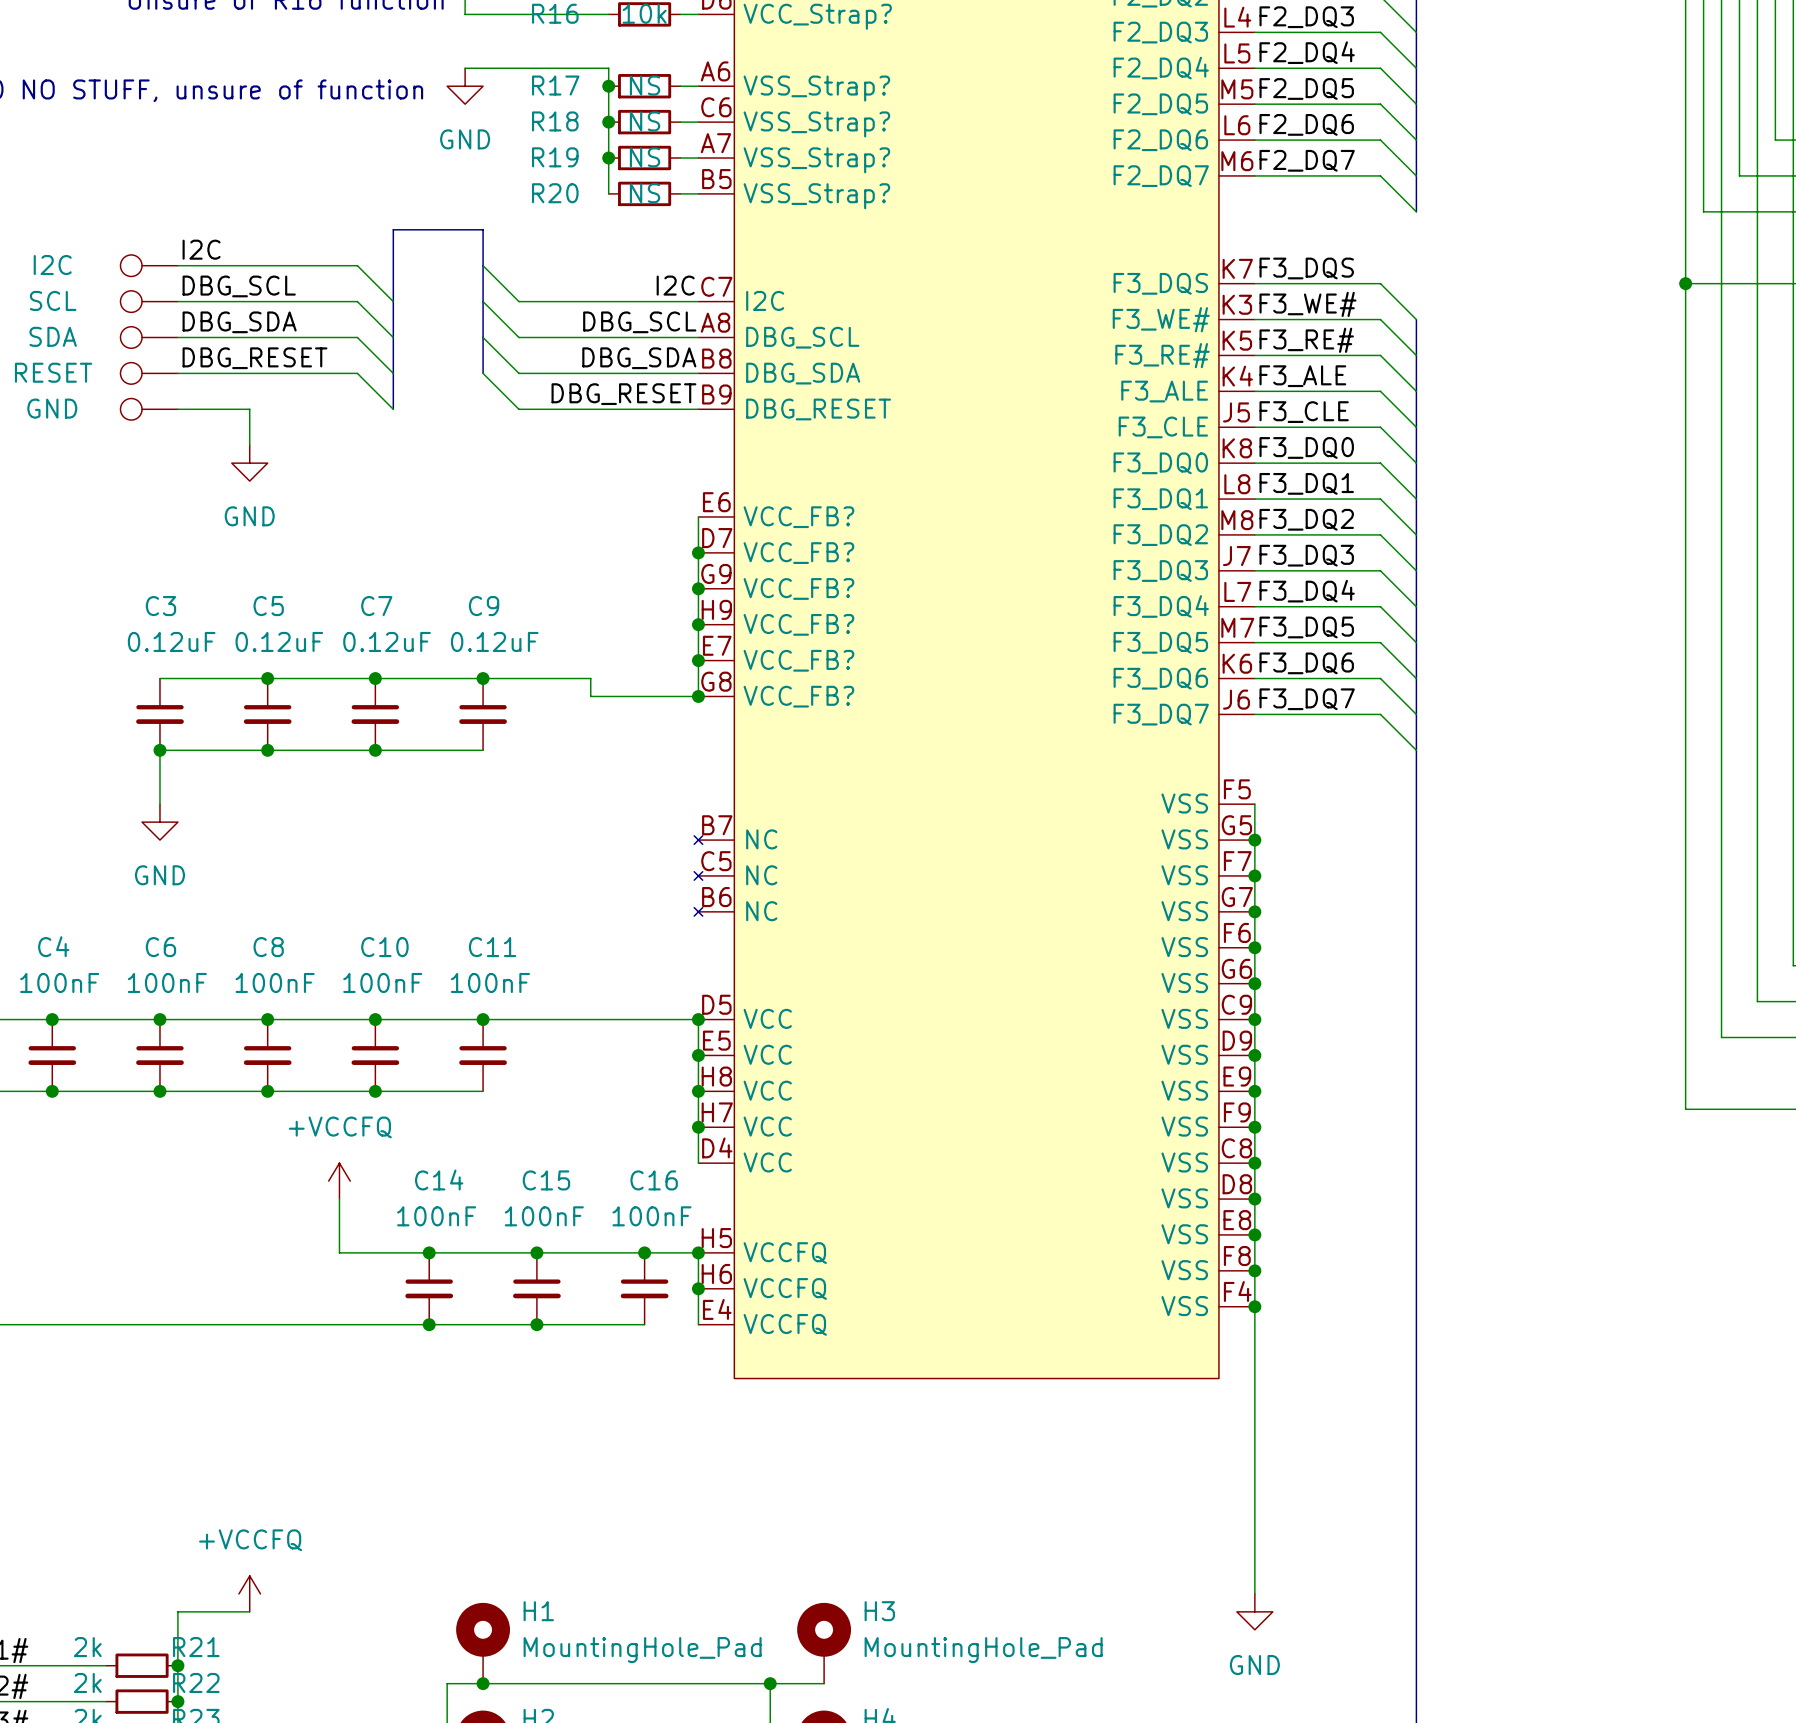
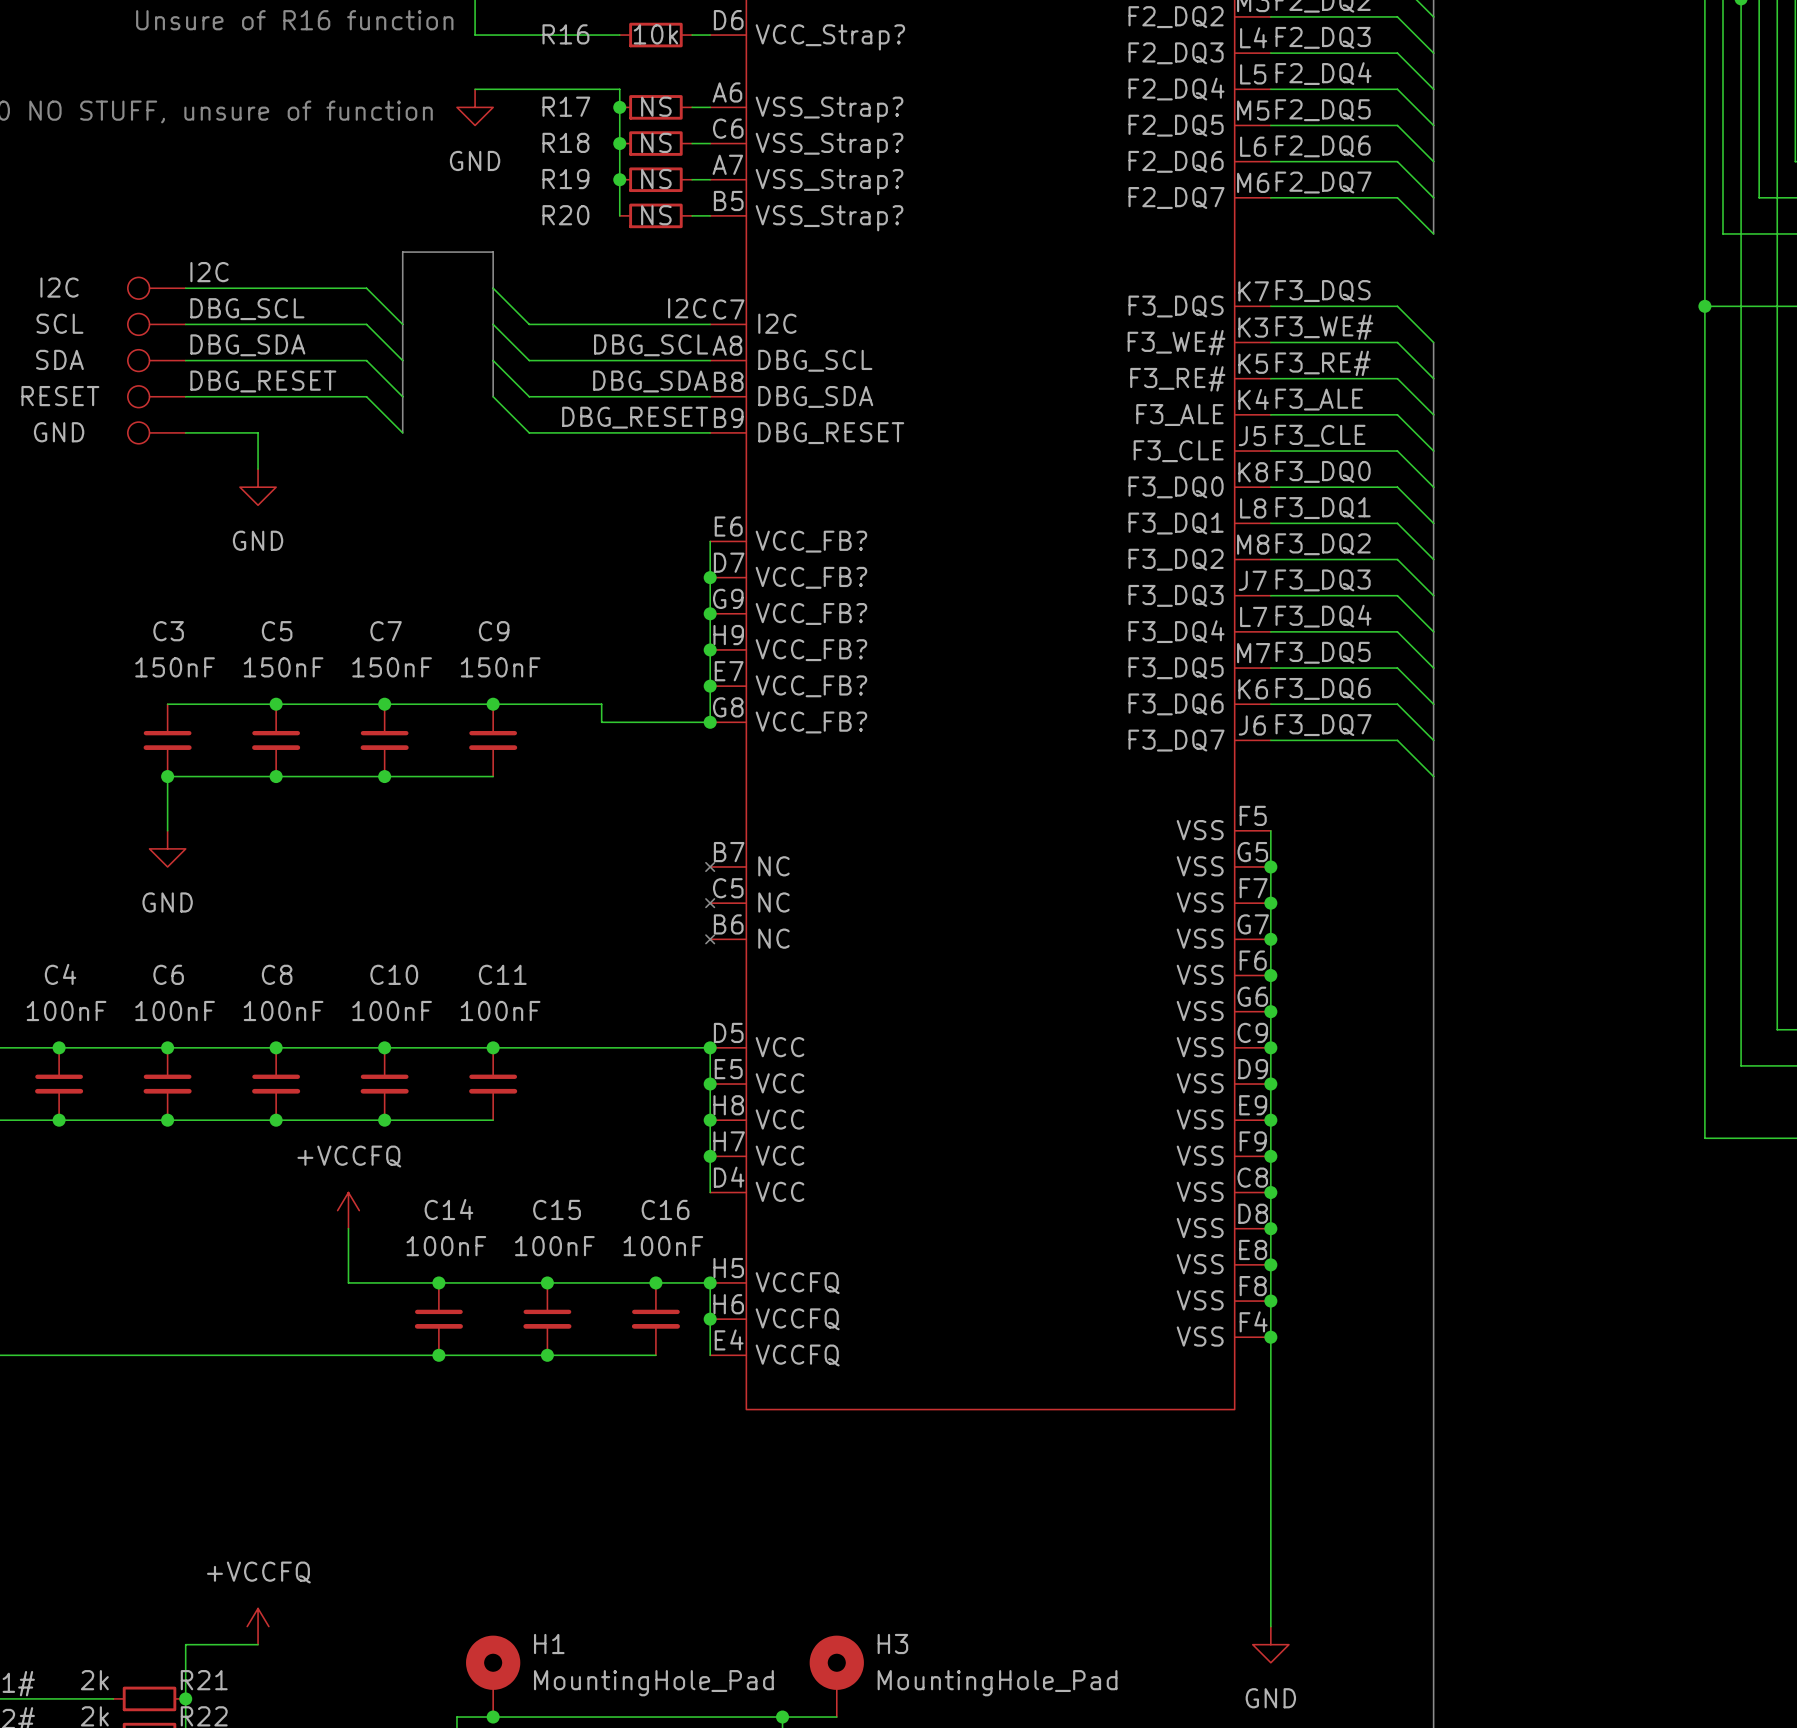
C3 value: 0.12uF (171, 641) -> 150nF (175, 667)
C5 value: 0.12uF (279, 641) -> 150nF (283, 667)
C7 value: 0.12uF (387, 641) -> 150nF (392, 667)
C9 value: 0.12uF (494, 641) -> 150nF (500, 667)

